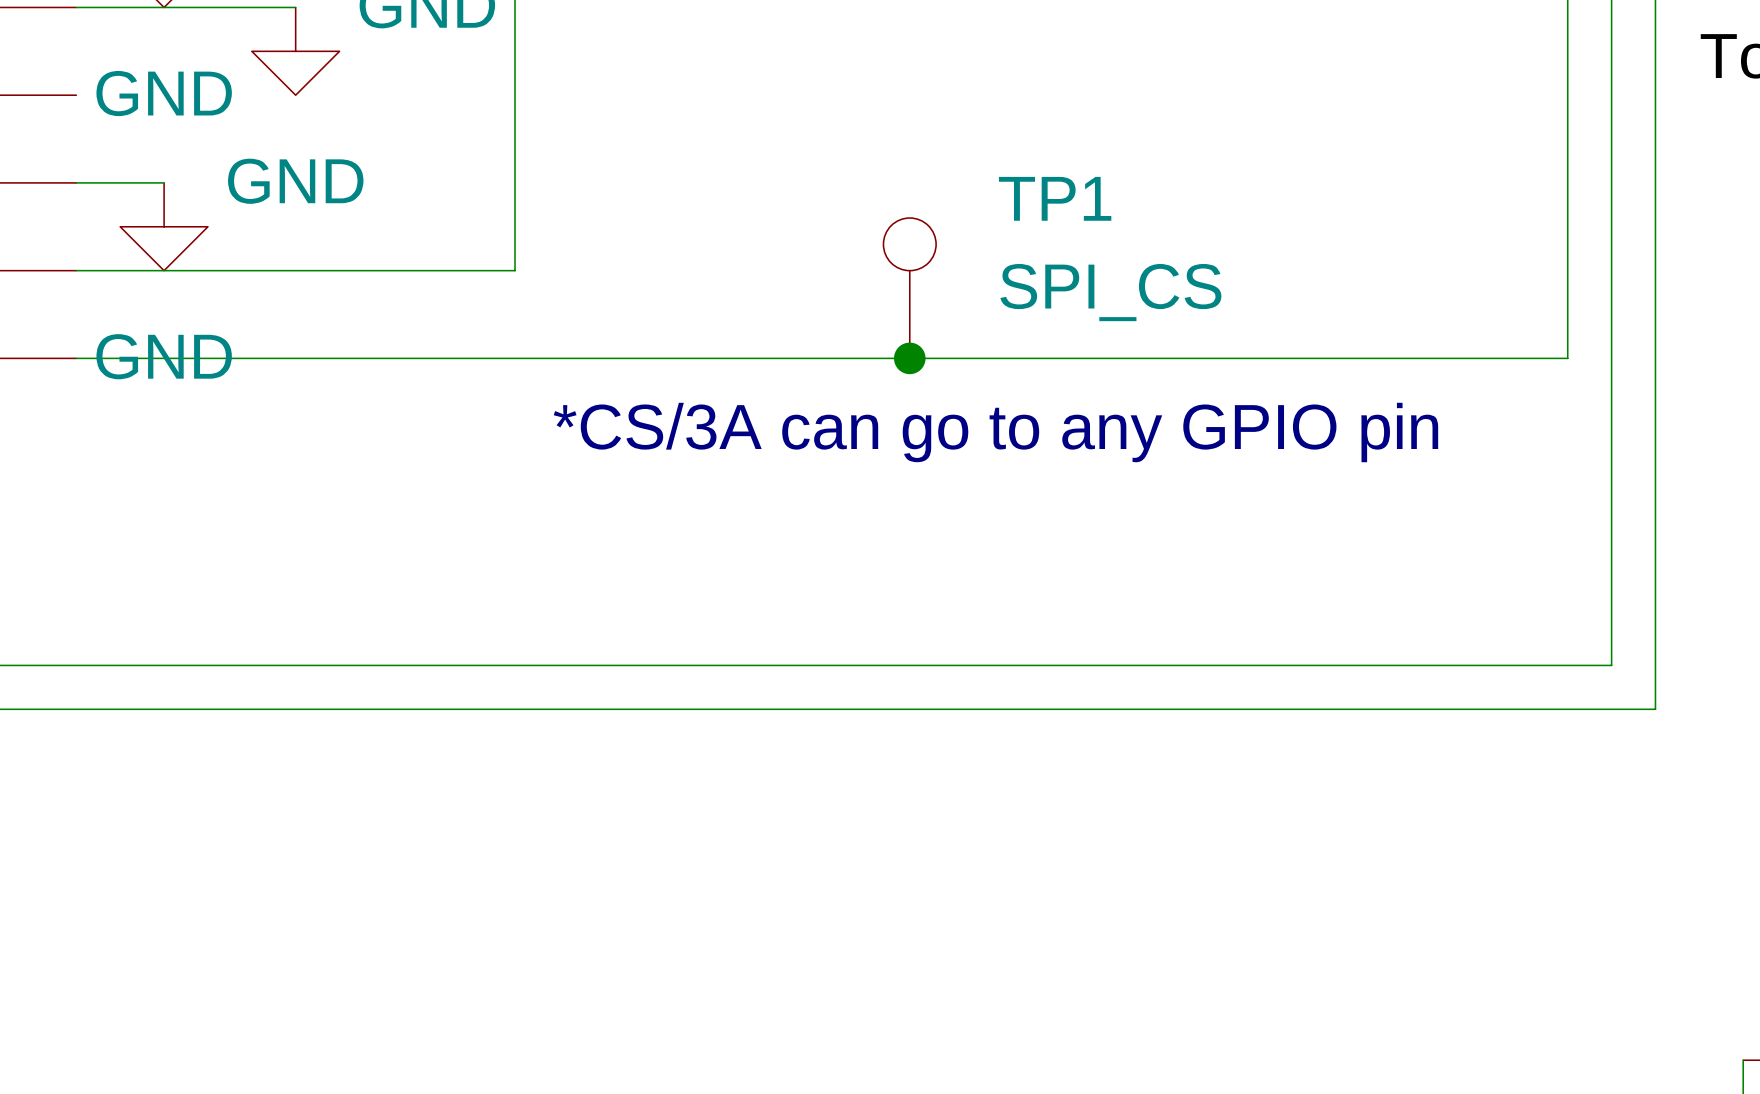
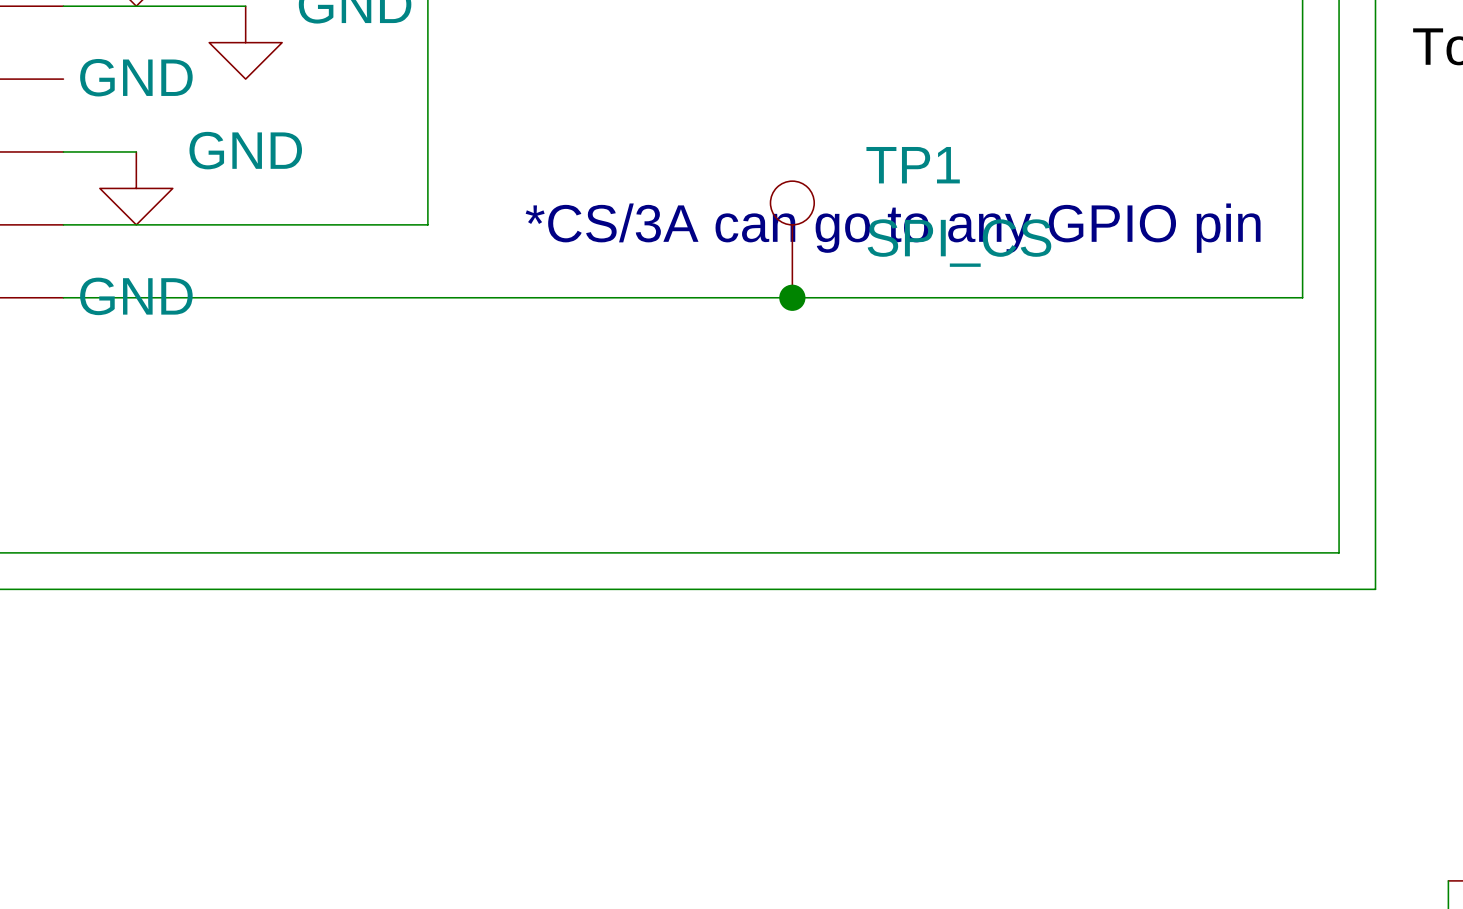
TP1 position: (909, 288) -> (792, 239)
junction position: (909, 358) -> (792, 297)
text position: *CS/3A can go to any GPIO pin (995, 432) -> *CS/3A can go to any GPIO pin (893, 228)

